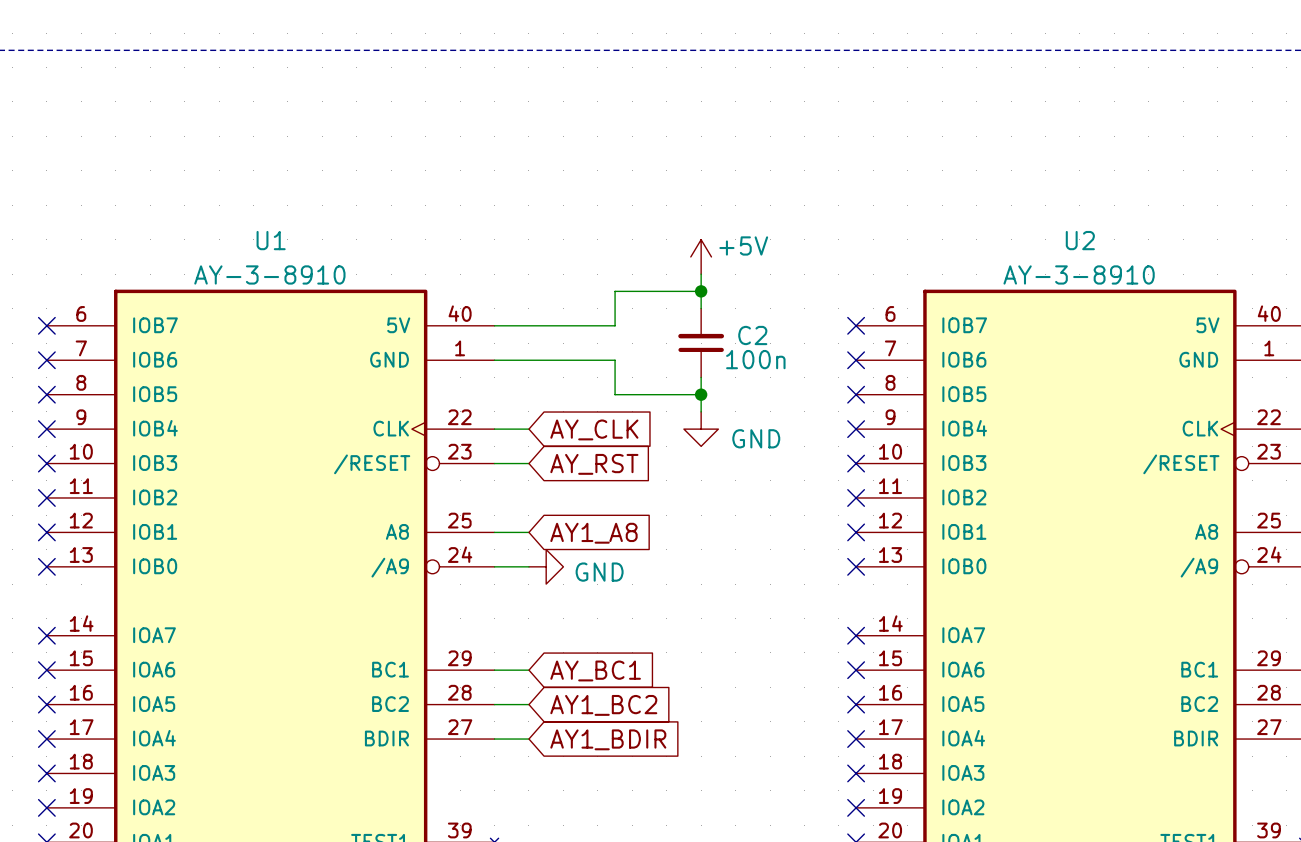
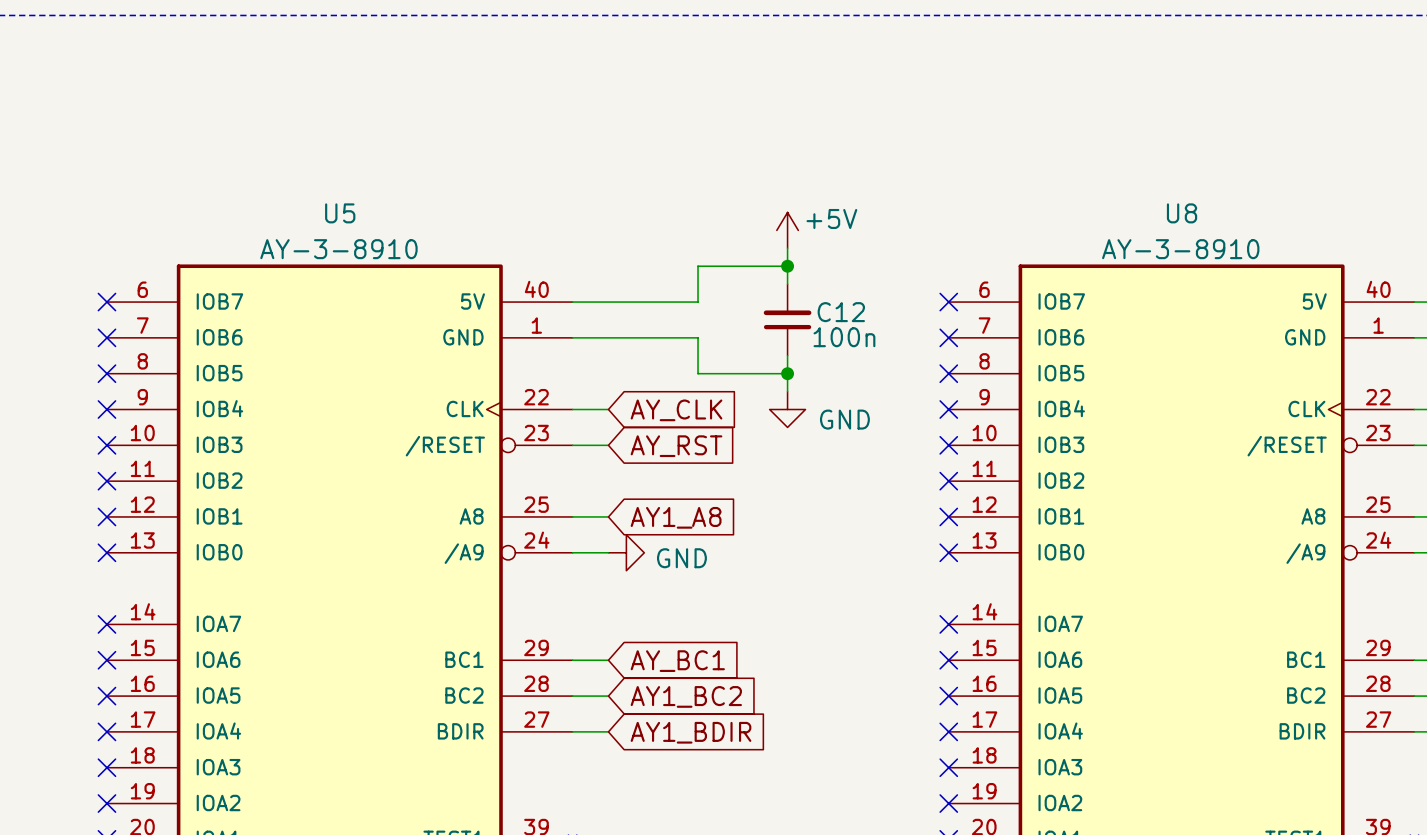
U1 name: U1 (271, 240) -> U5 (340, 213)
U2 name: U2 (1080, 240) -> U8 (1182, 213)
C2 name: C2 (752, 335) -> C12 (841, 312)

